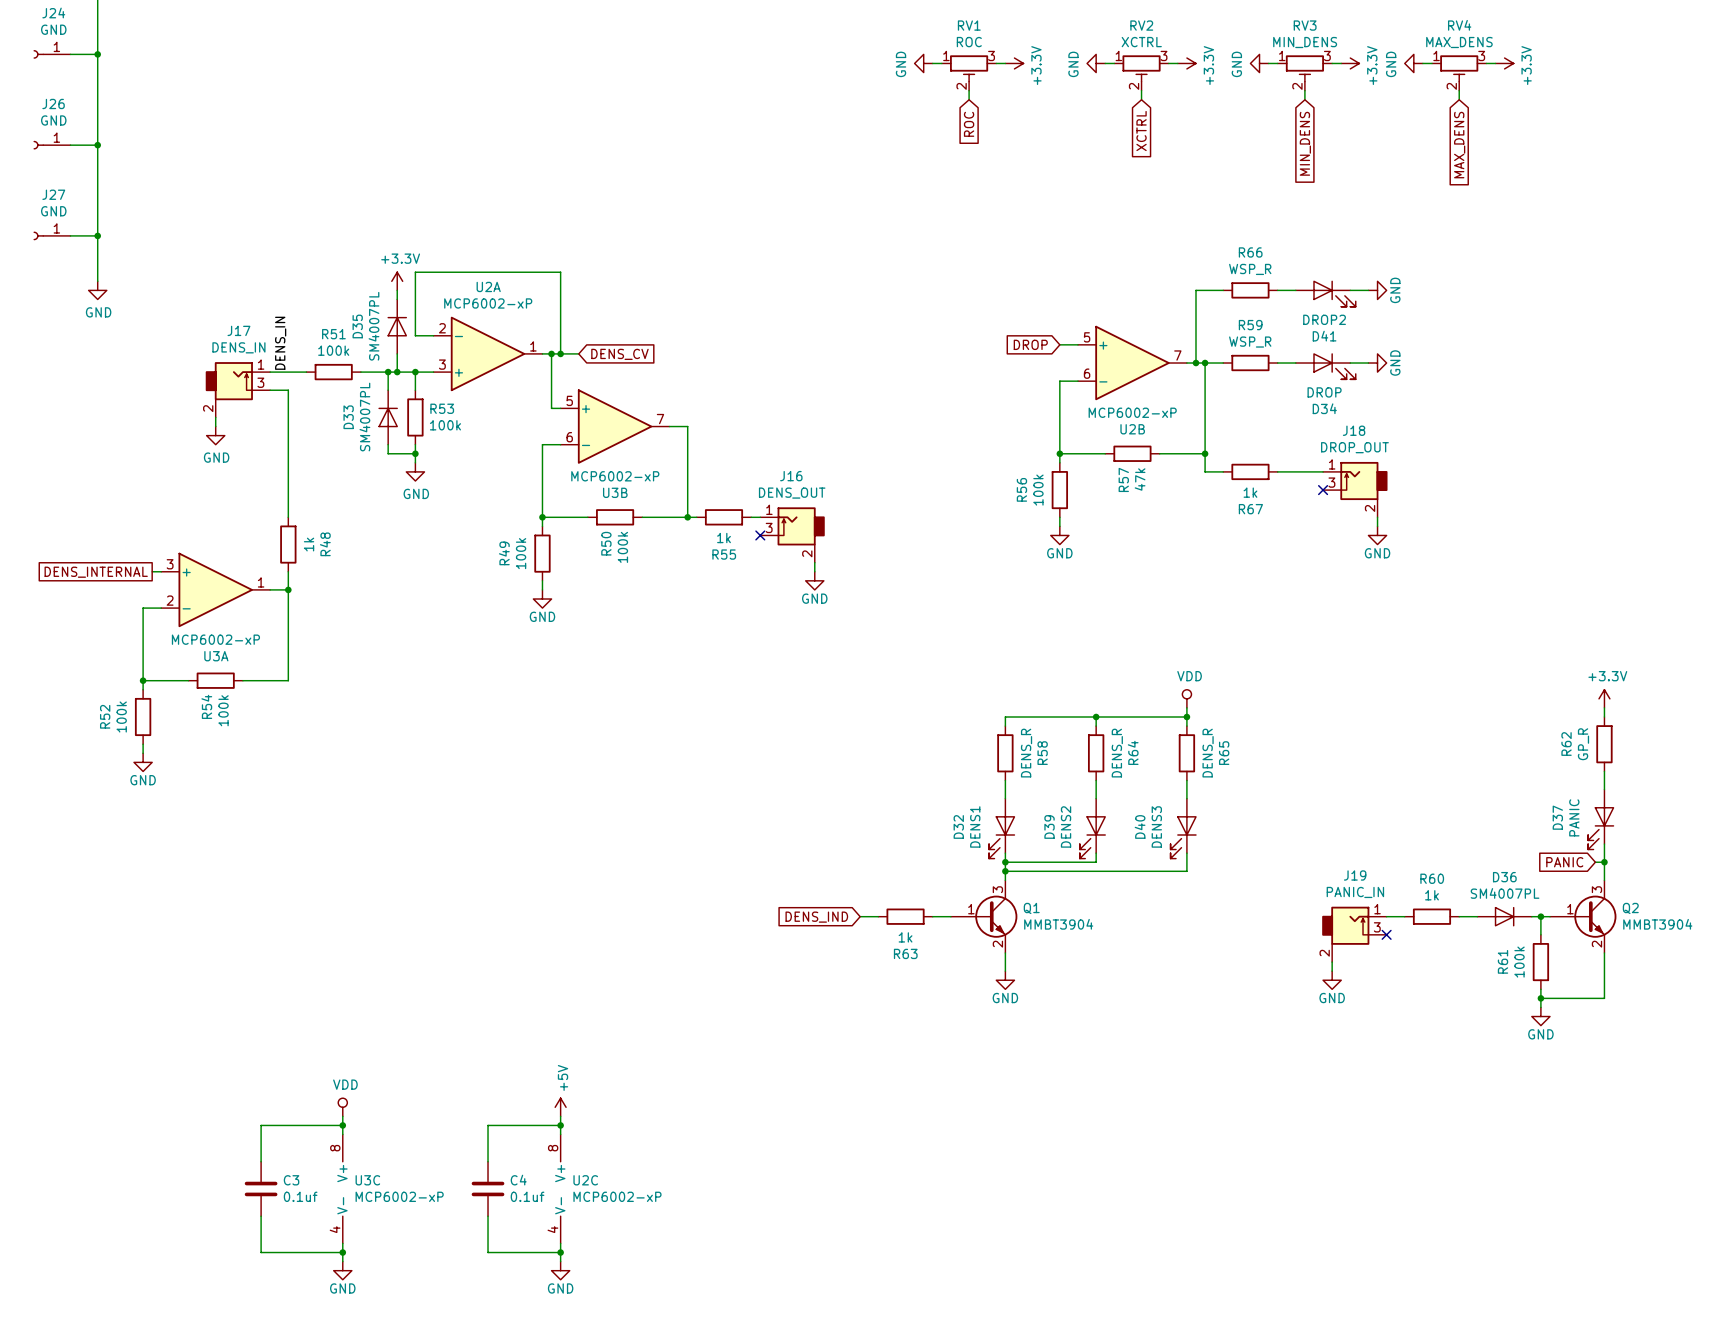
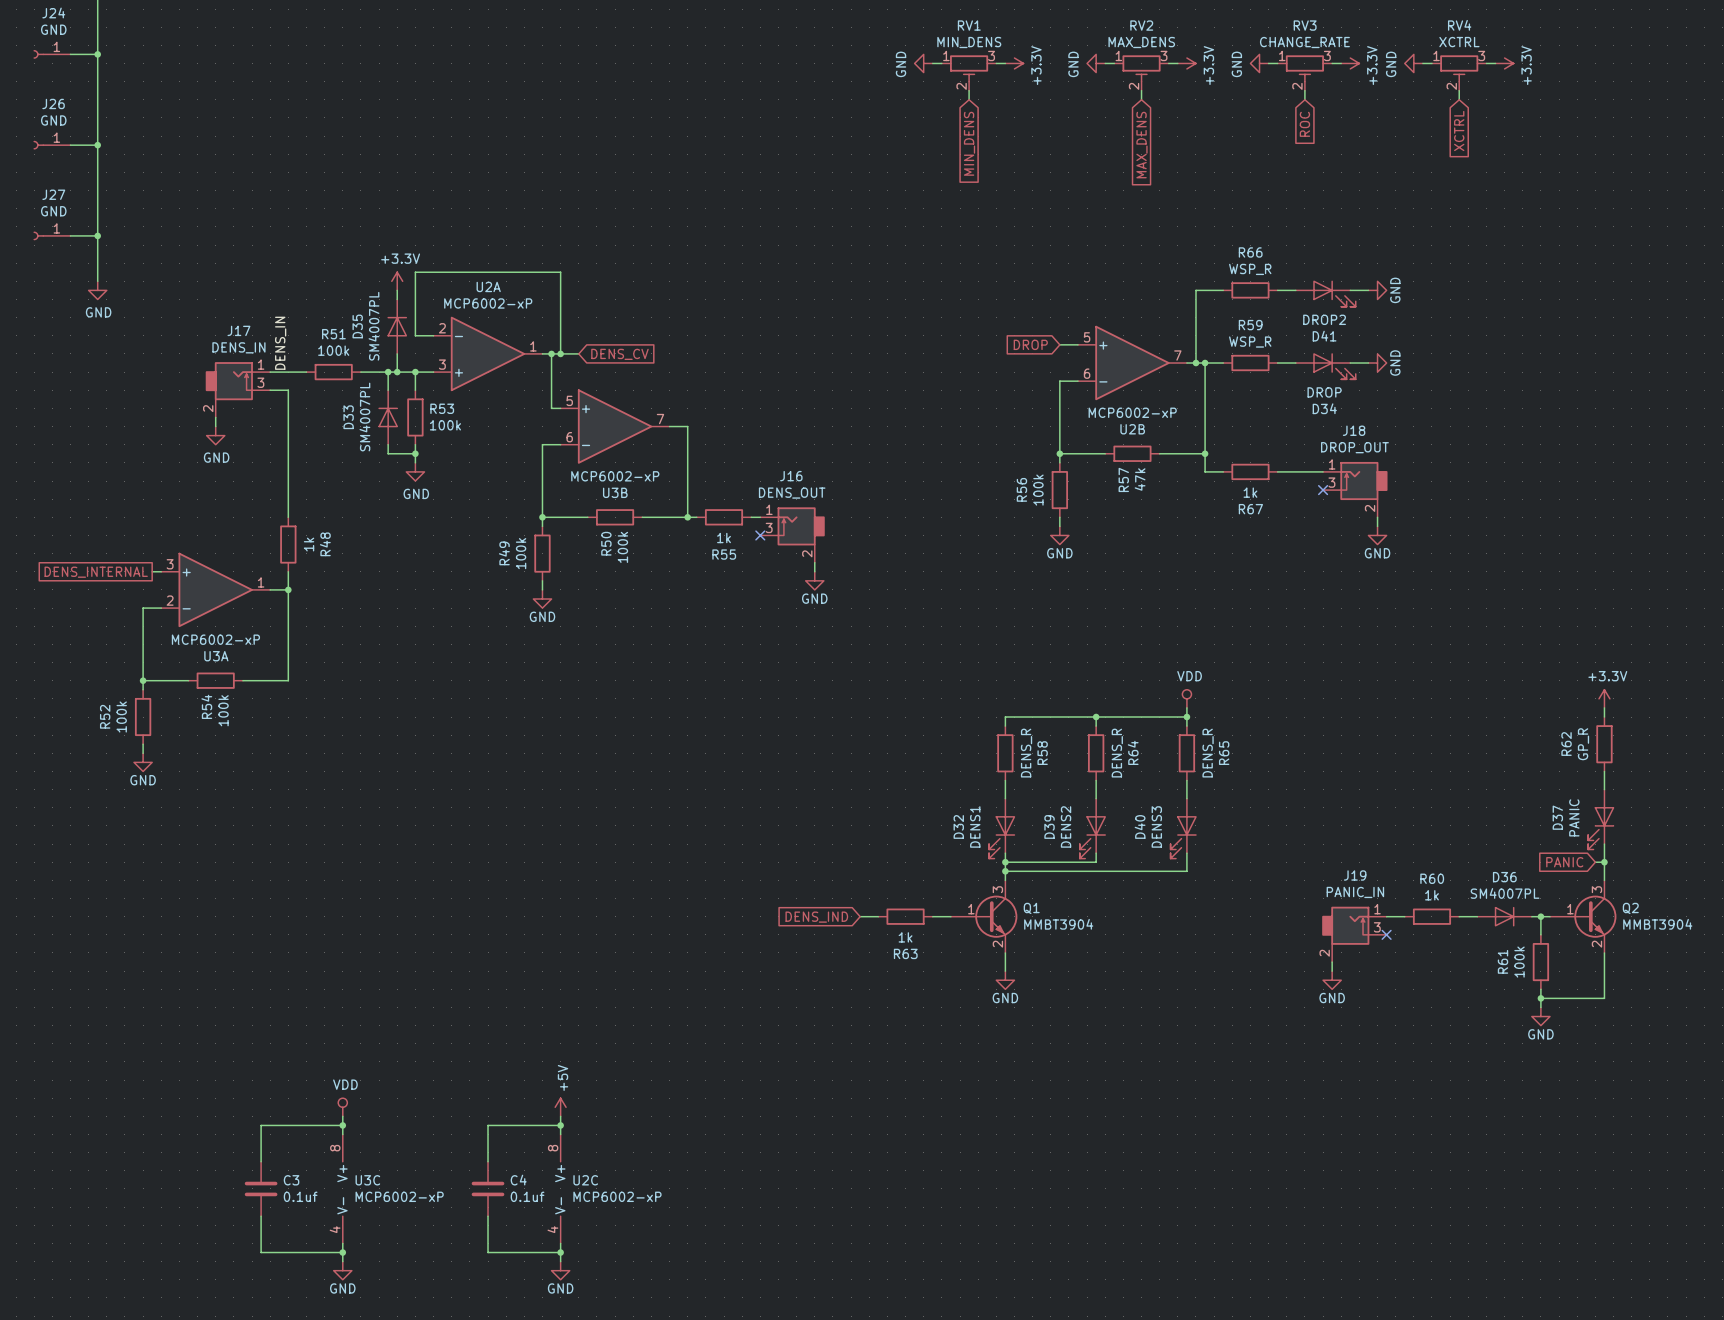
RV1 value: ROC (969, 42) -> MIN_DENS (969, 42)
RV2 value: XCTRL (1141, 42) -> MAX_DENS (1141, 42)
RV3 value: MIN_DENS (1305, 42) -> CHANGE_RATE (1304, 42)
RV4 value: MAX_DENS (1459, 42) -> XCTRL (1459, 42)
global label: ROC (969, 124) -> MIN_DENS (969, 143)
global label: XCTRL (1141, 131) -> MAX_DENS (1141, 145)
global label: MIN_DENS (1305, 143) -> ROC (1304, 124)
global label: MAX_DENS (1459, 145) -> XCTRL (1459, 131)

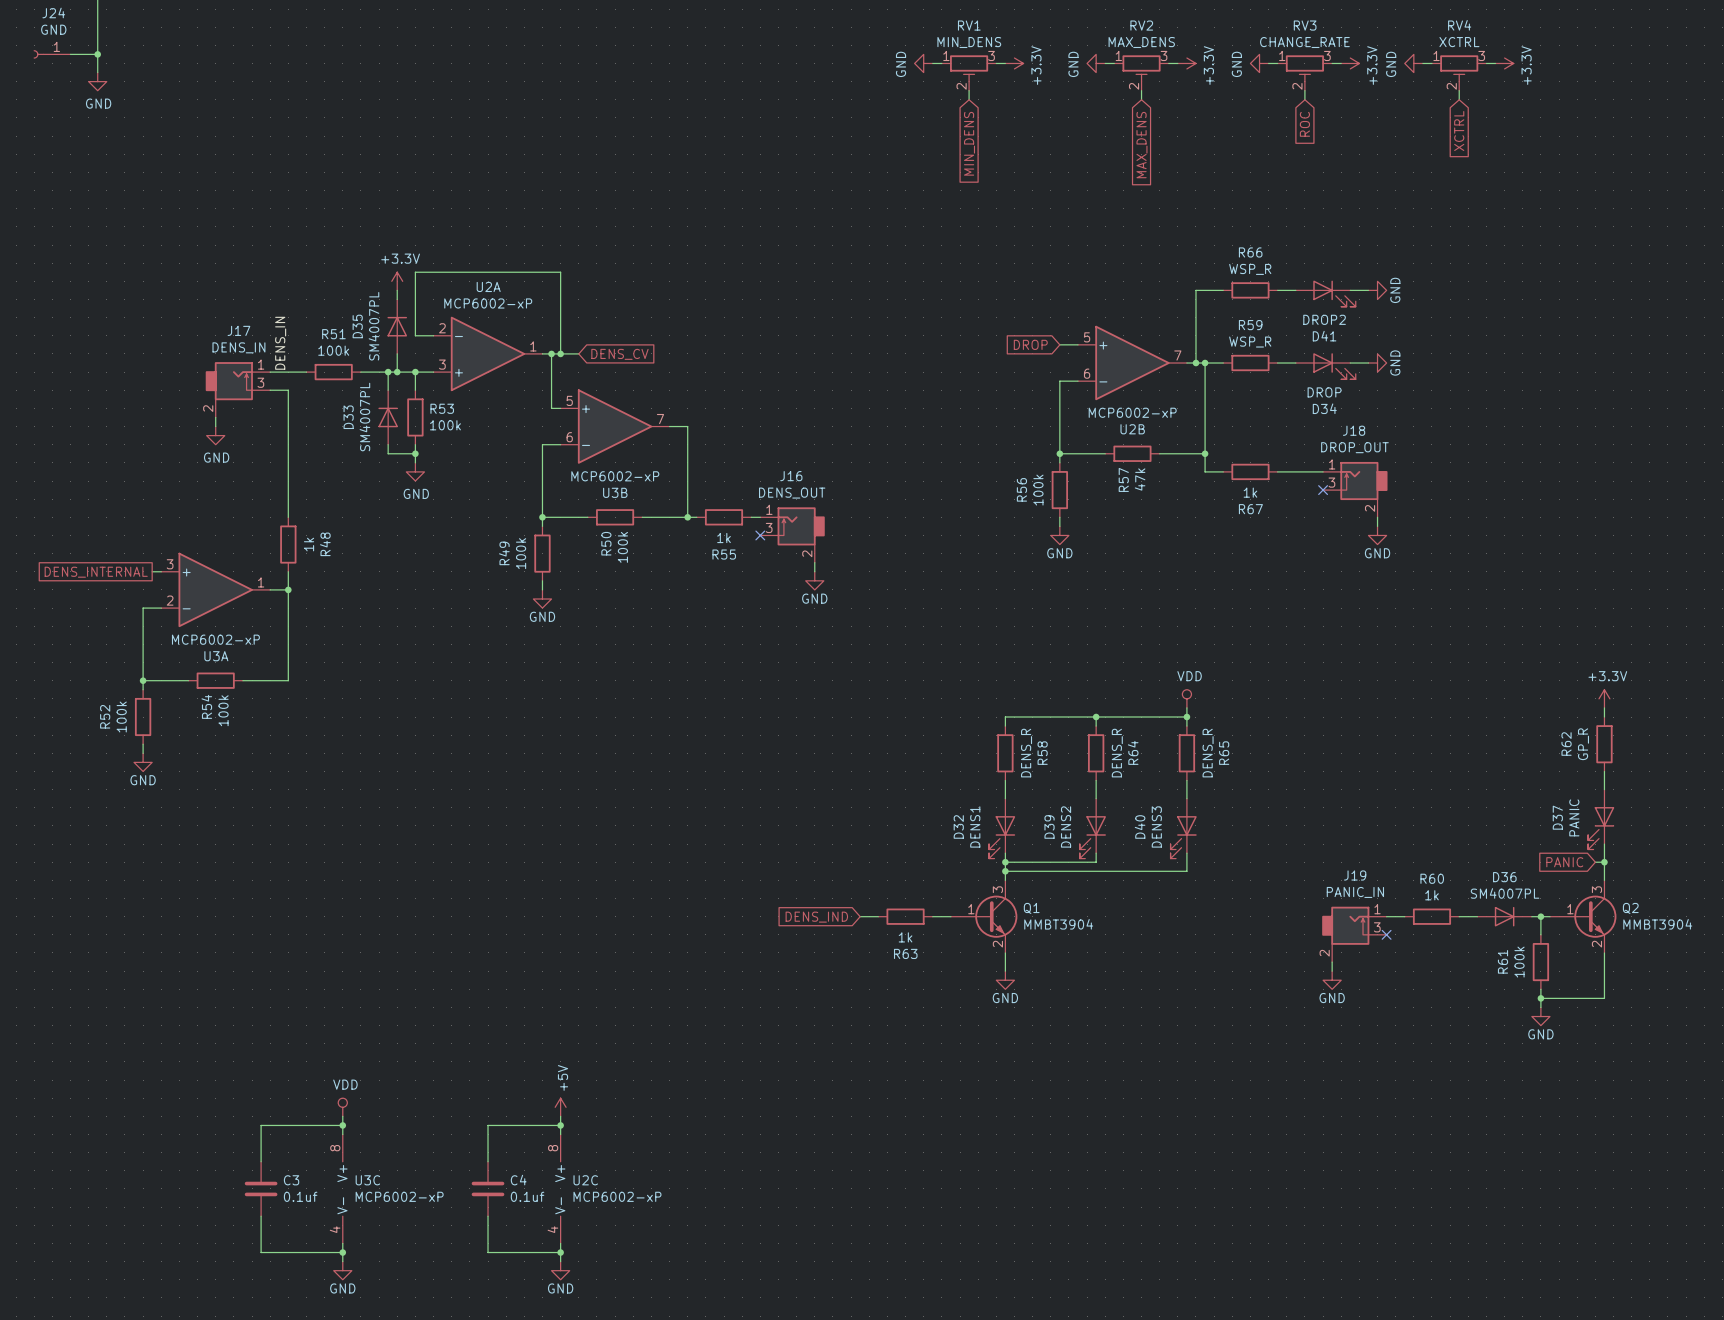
wire: (97, 72) (97, 281) -> none
power symbol: none -> GND (97, 81)
J26: GND (52, 145) -> none
wire: (70, 145) (97, 145) -> none
junction: (97, 145) -> none
J27: GND (52, 235) -> none
wire: (70, 235) (97, 235) -> none
junction: (97, 235) -> none
power symbol: GND (97, 290) -> none

